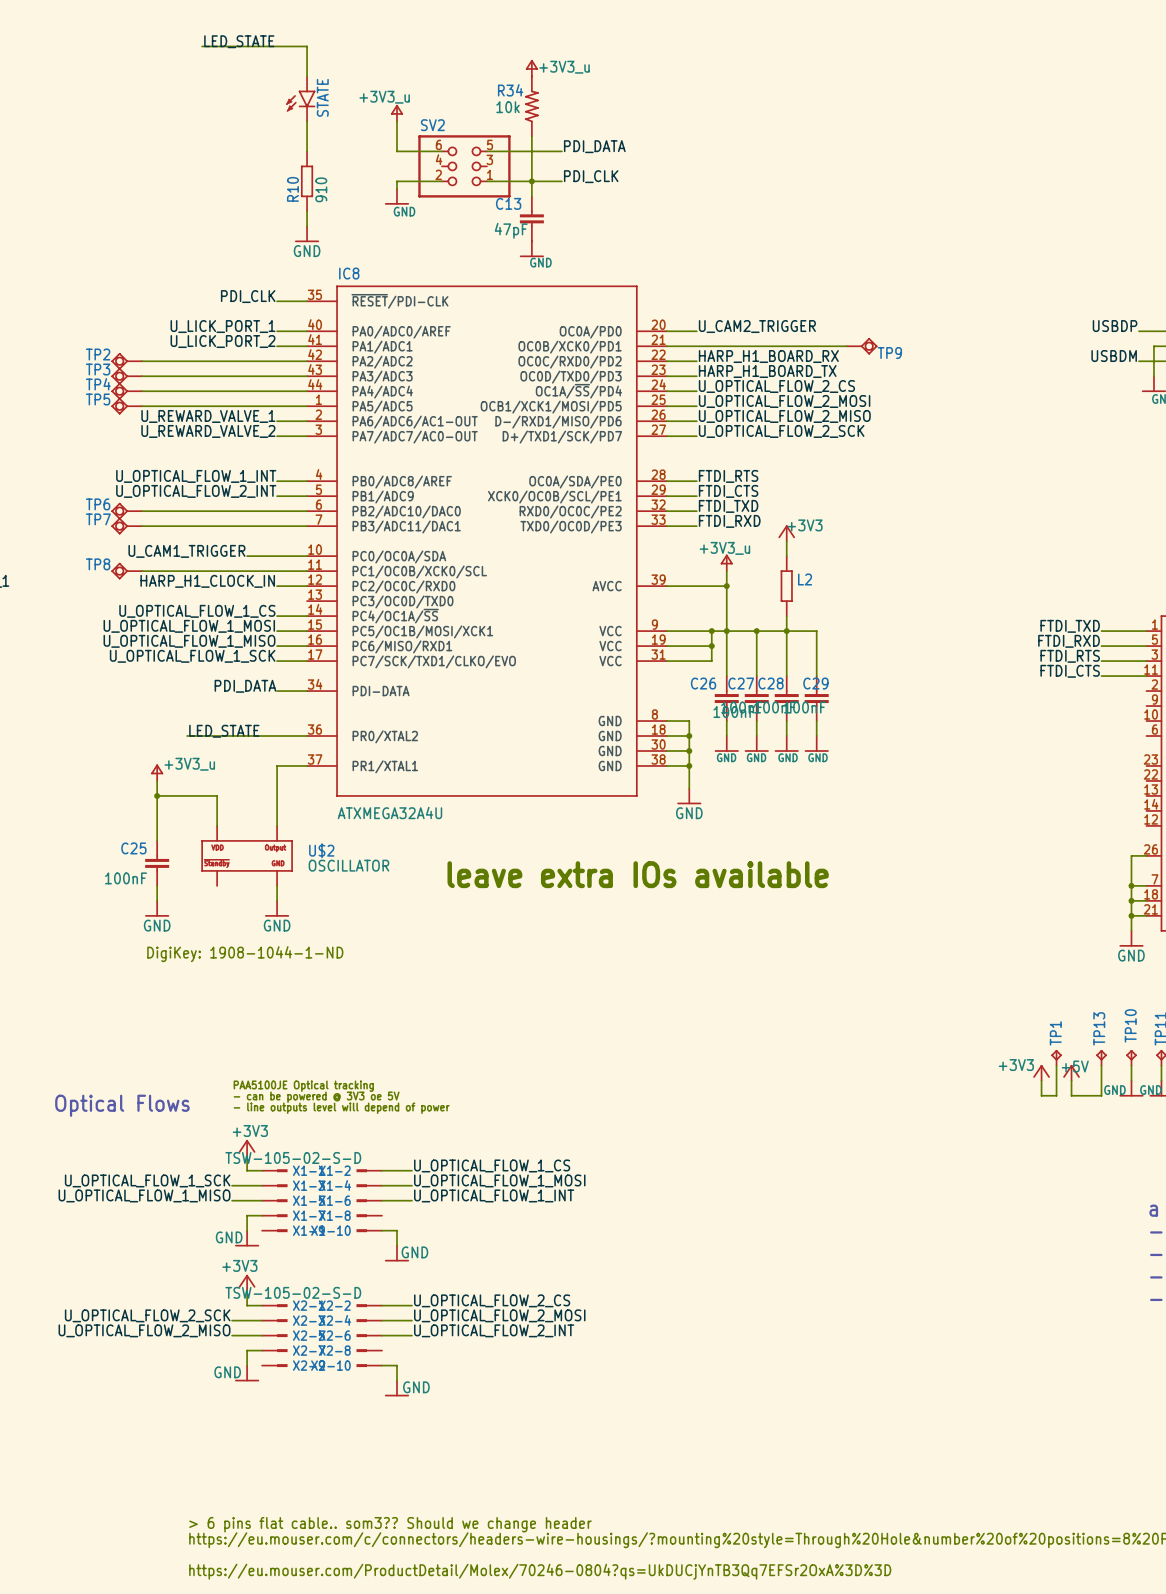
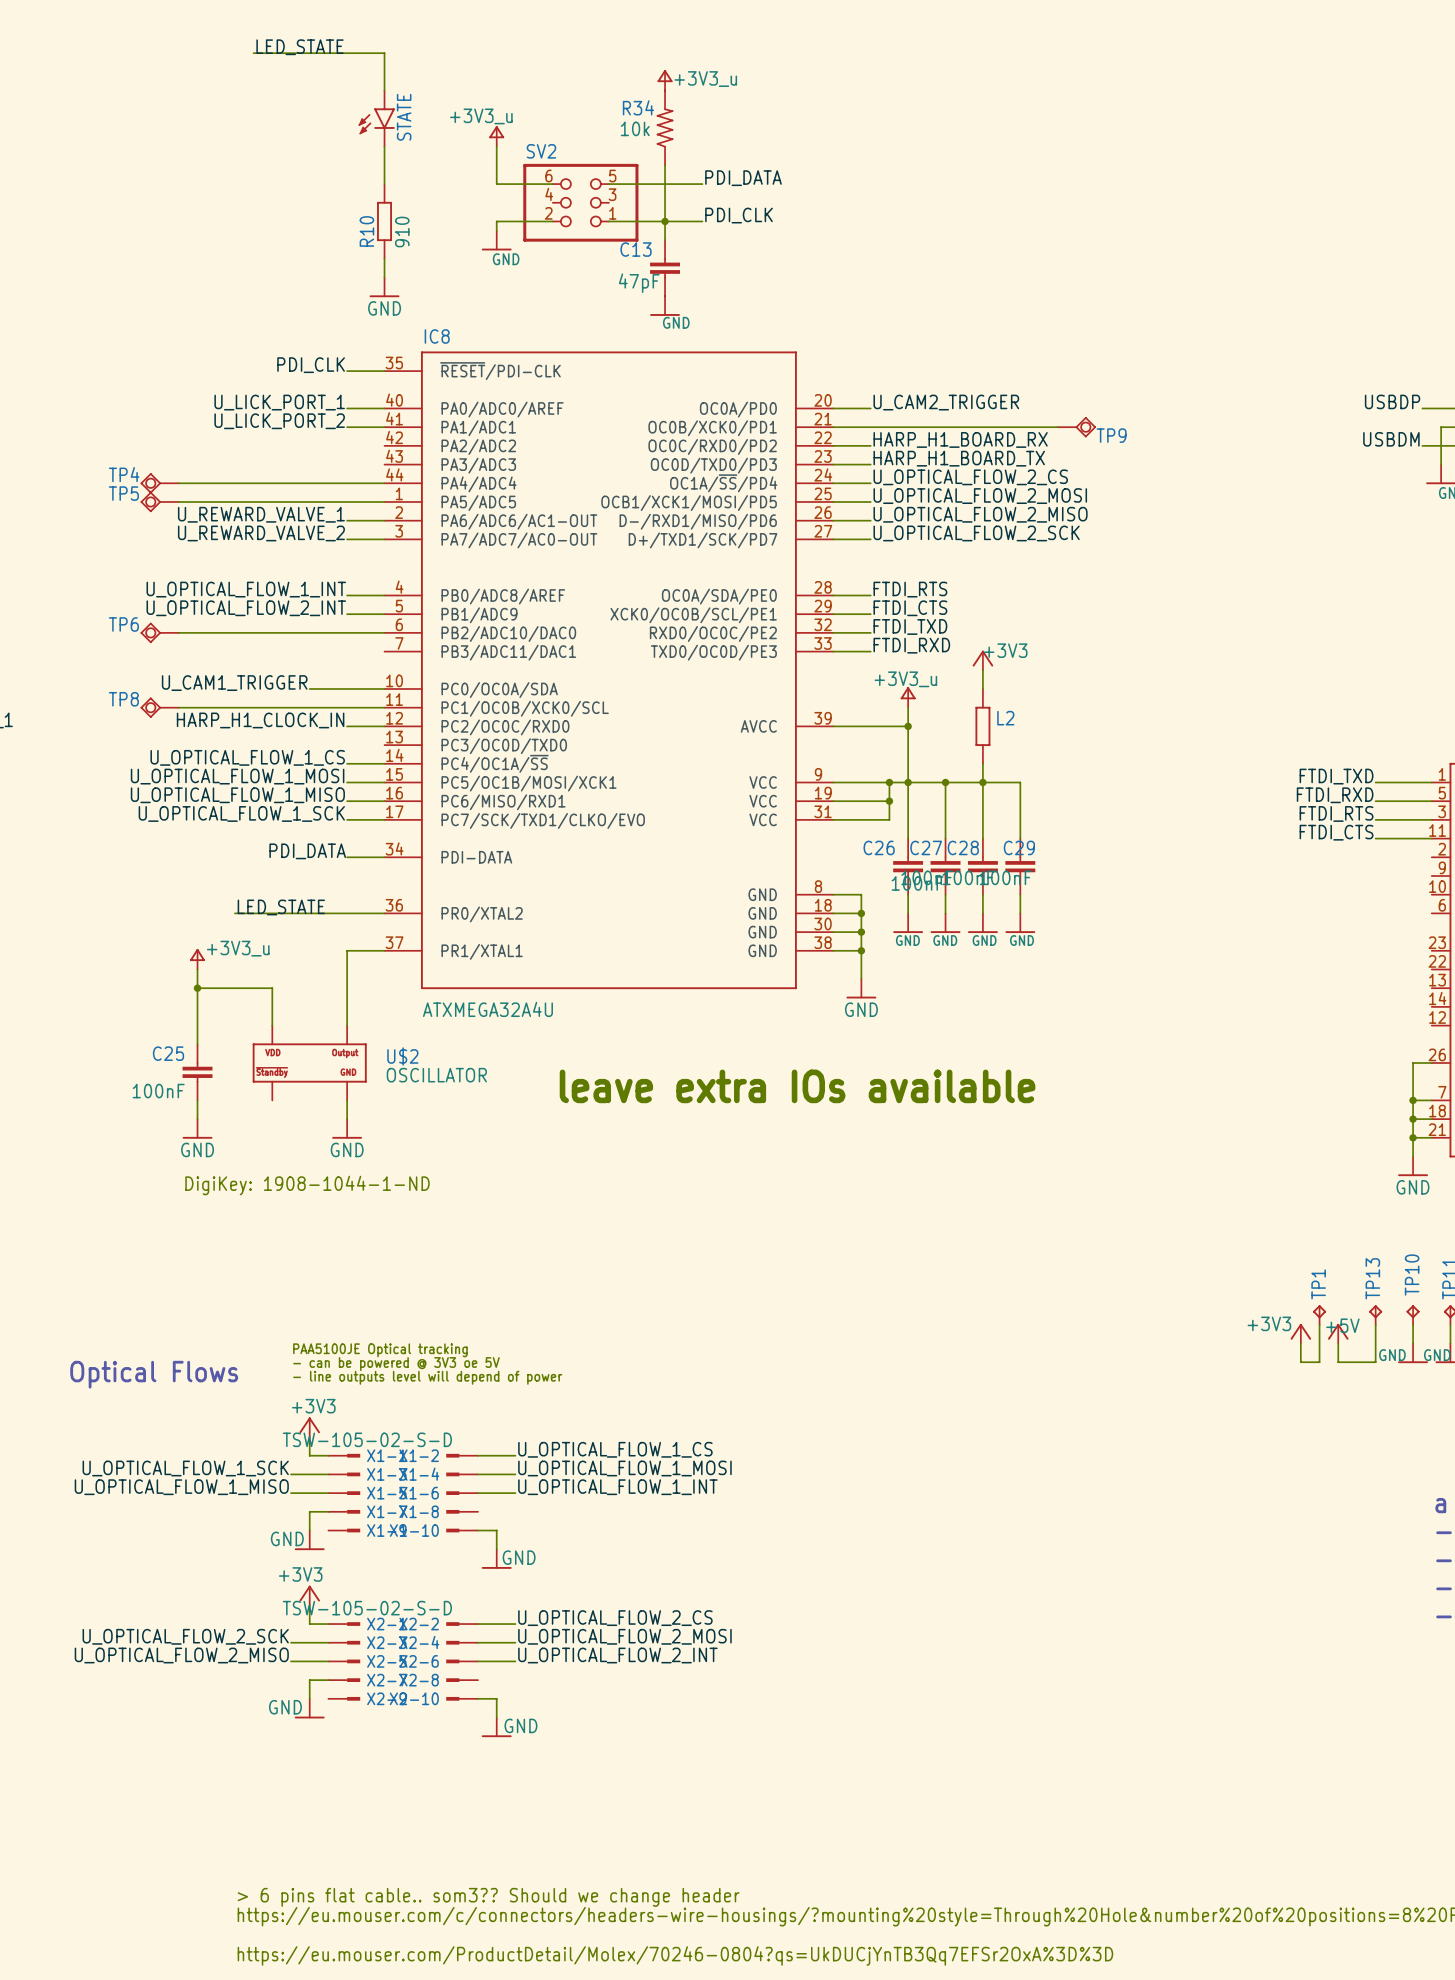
TP2: (126, 361) -> none
wire: (142, 361) (307, 361) -> none
TP3: (126, 376) -> none
wire: (142, 376) (307, 376) -> none
TP7: (126, 526) -> none
wire: (142, 526) (307, 526) -> none

